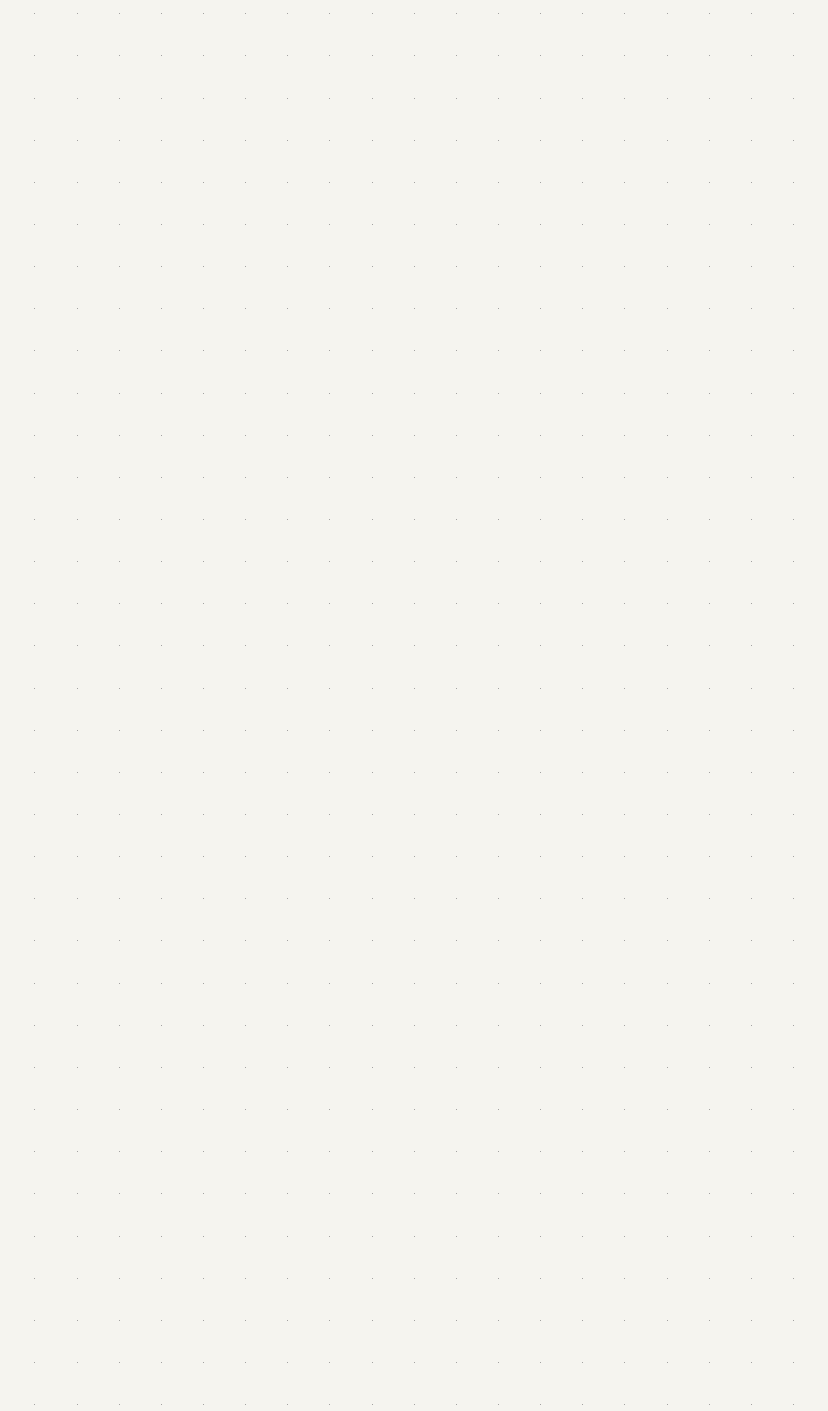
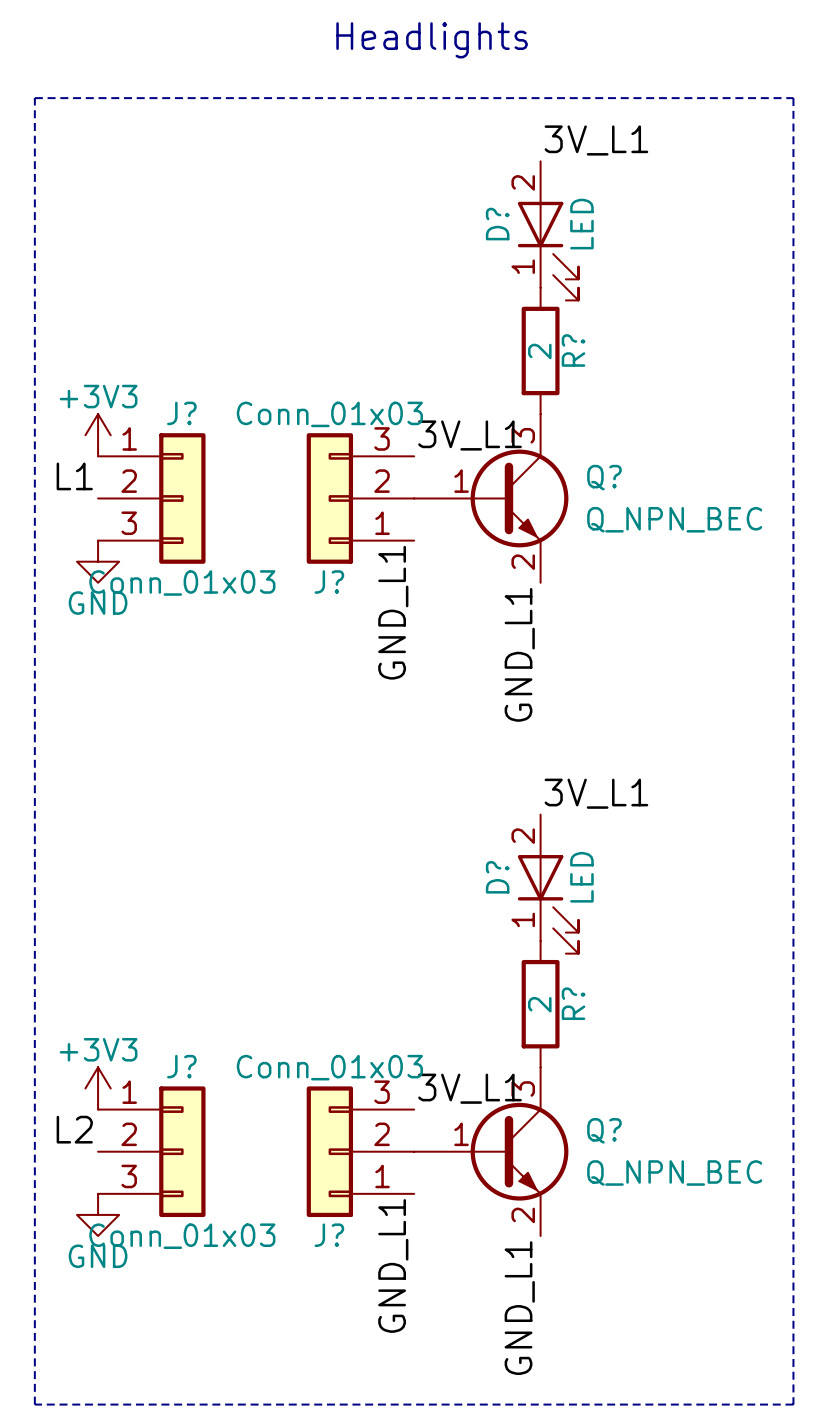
text: none -> Headlights (432, 40)
line: none -> (34, 98) (793, 98) (793, 1404) (34, 1404) (34, 98)
label: none -> 3V_L1 (596, 140)
D?: none -> LED (548, 230)
R?: none -> 2 (540, 350)
power symbol: none -> +3V3 (98, 435)
label: none -> 3V_L1 (470, 435)
label: none -> L1 (74, 476)
J?: none -> Conn_01x03 (151, 498)
J?: none -> Conn_01x03 (360, 498)
Q?: none -> Q_NPN_BEC (491, 498)
power symbol: none -> GND (98, 561)
label: none -> GND_L1 (393, 612)
label: none -> GND_L1 (519, 654)
label: none -> 3V_L1 (596, 793)
D?: none -> LED (548, 884)
R?: none -> 2 (540, 1004)
power symbol: none -> +3V3 (98, 1088)
label: none -> 3V_L1 (470, 1088)
label: none -> L2 (74, 1129)
J?: none -> Conn_01x03 (151, 1151)
J?: none -> Conn_01x03 (360, 1151)
Q?: none -> Q_NPN_BEC (491, 1151)
power symbol: none -> GND (98, 1214)
label: none -> GND_L1 (393, 1265)
label: none -> GND_L1 (519, 1308)

